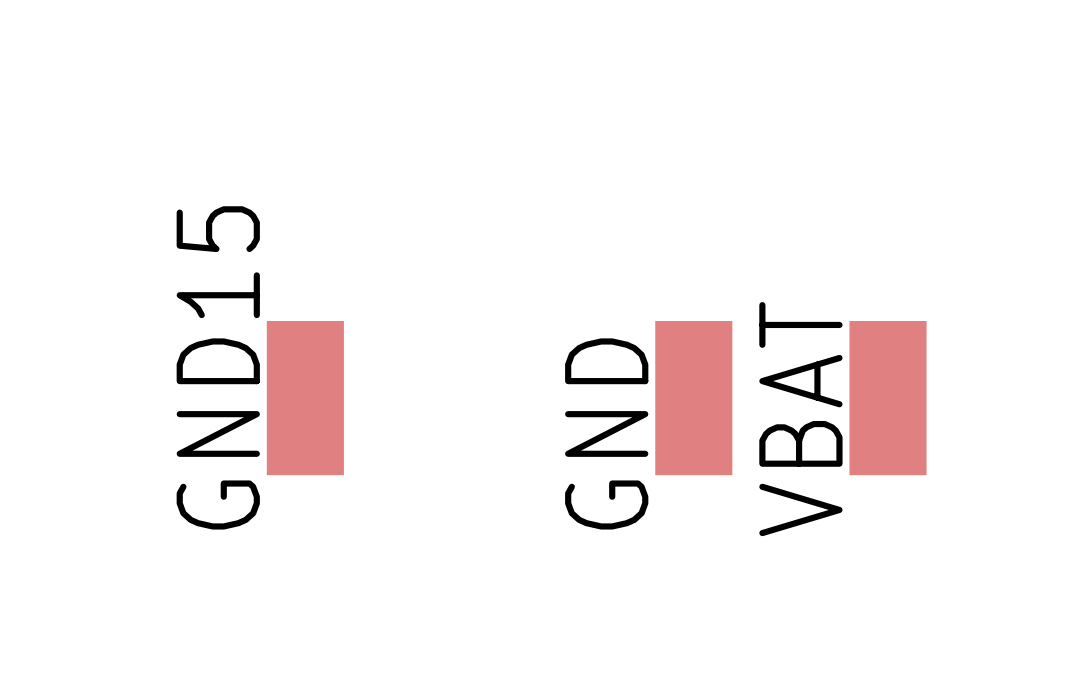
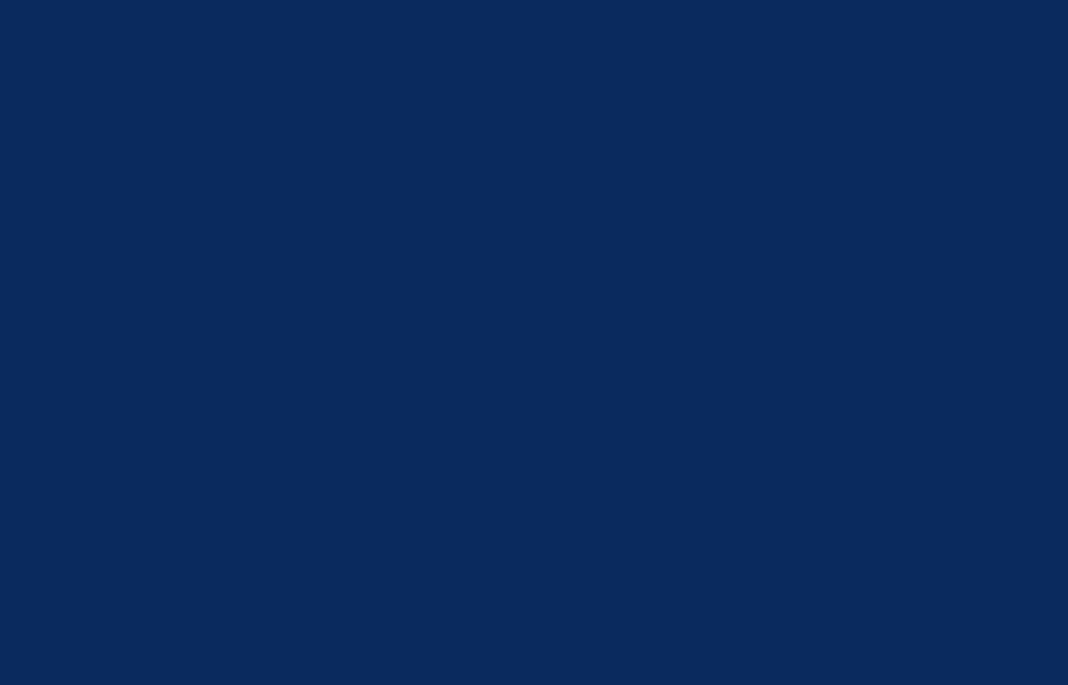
GND15: (305, 398) -> none
GND: (693, 398) -> none
VBAT: (888, 398) -> none

